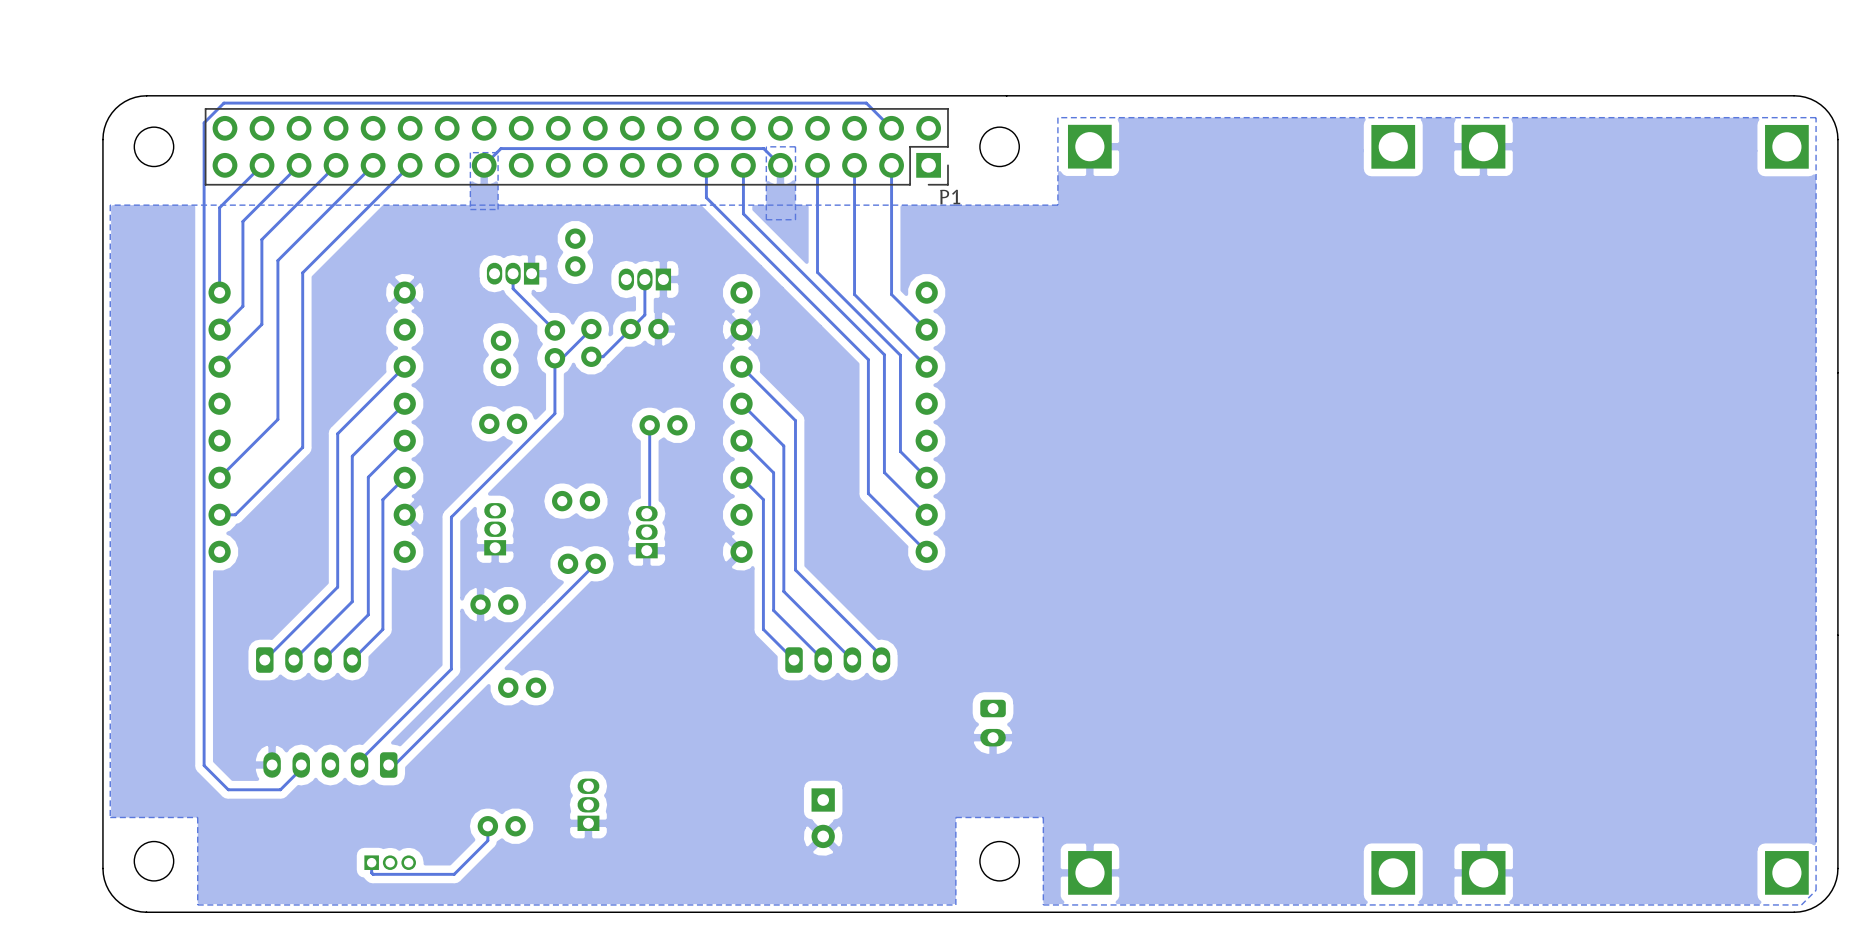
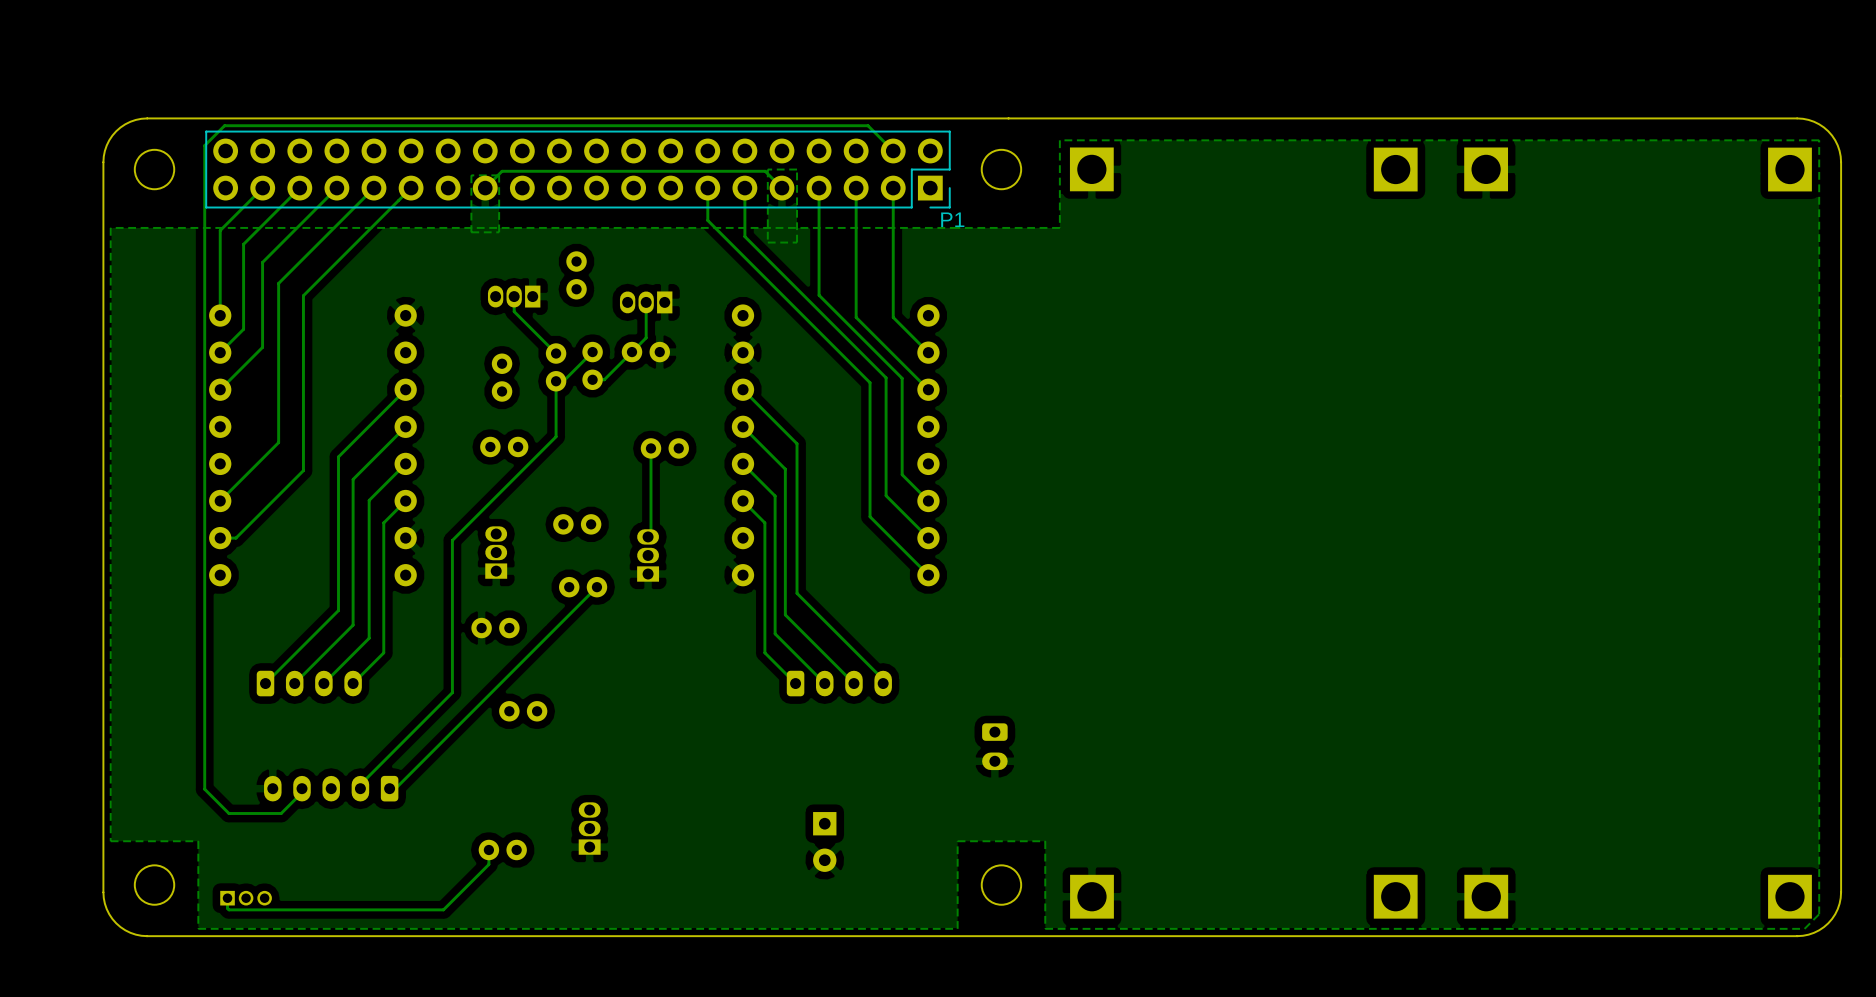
track: (371, 862) (373, 874) (454, 874) -> (227, 898) (228, 909) (443, 909) (455, 898)
part position: (390, 862) -> (246, 898)

